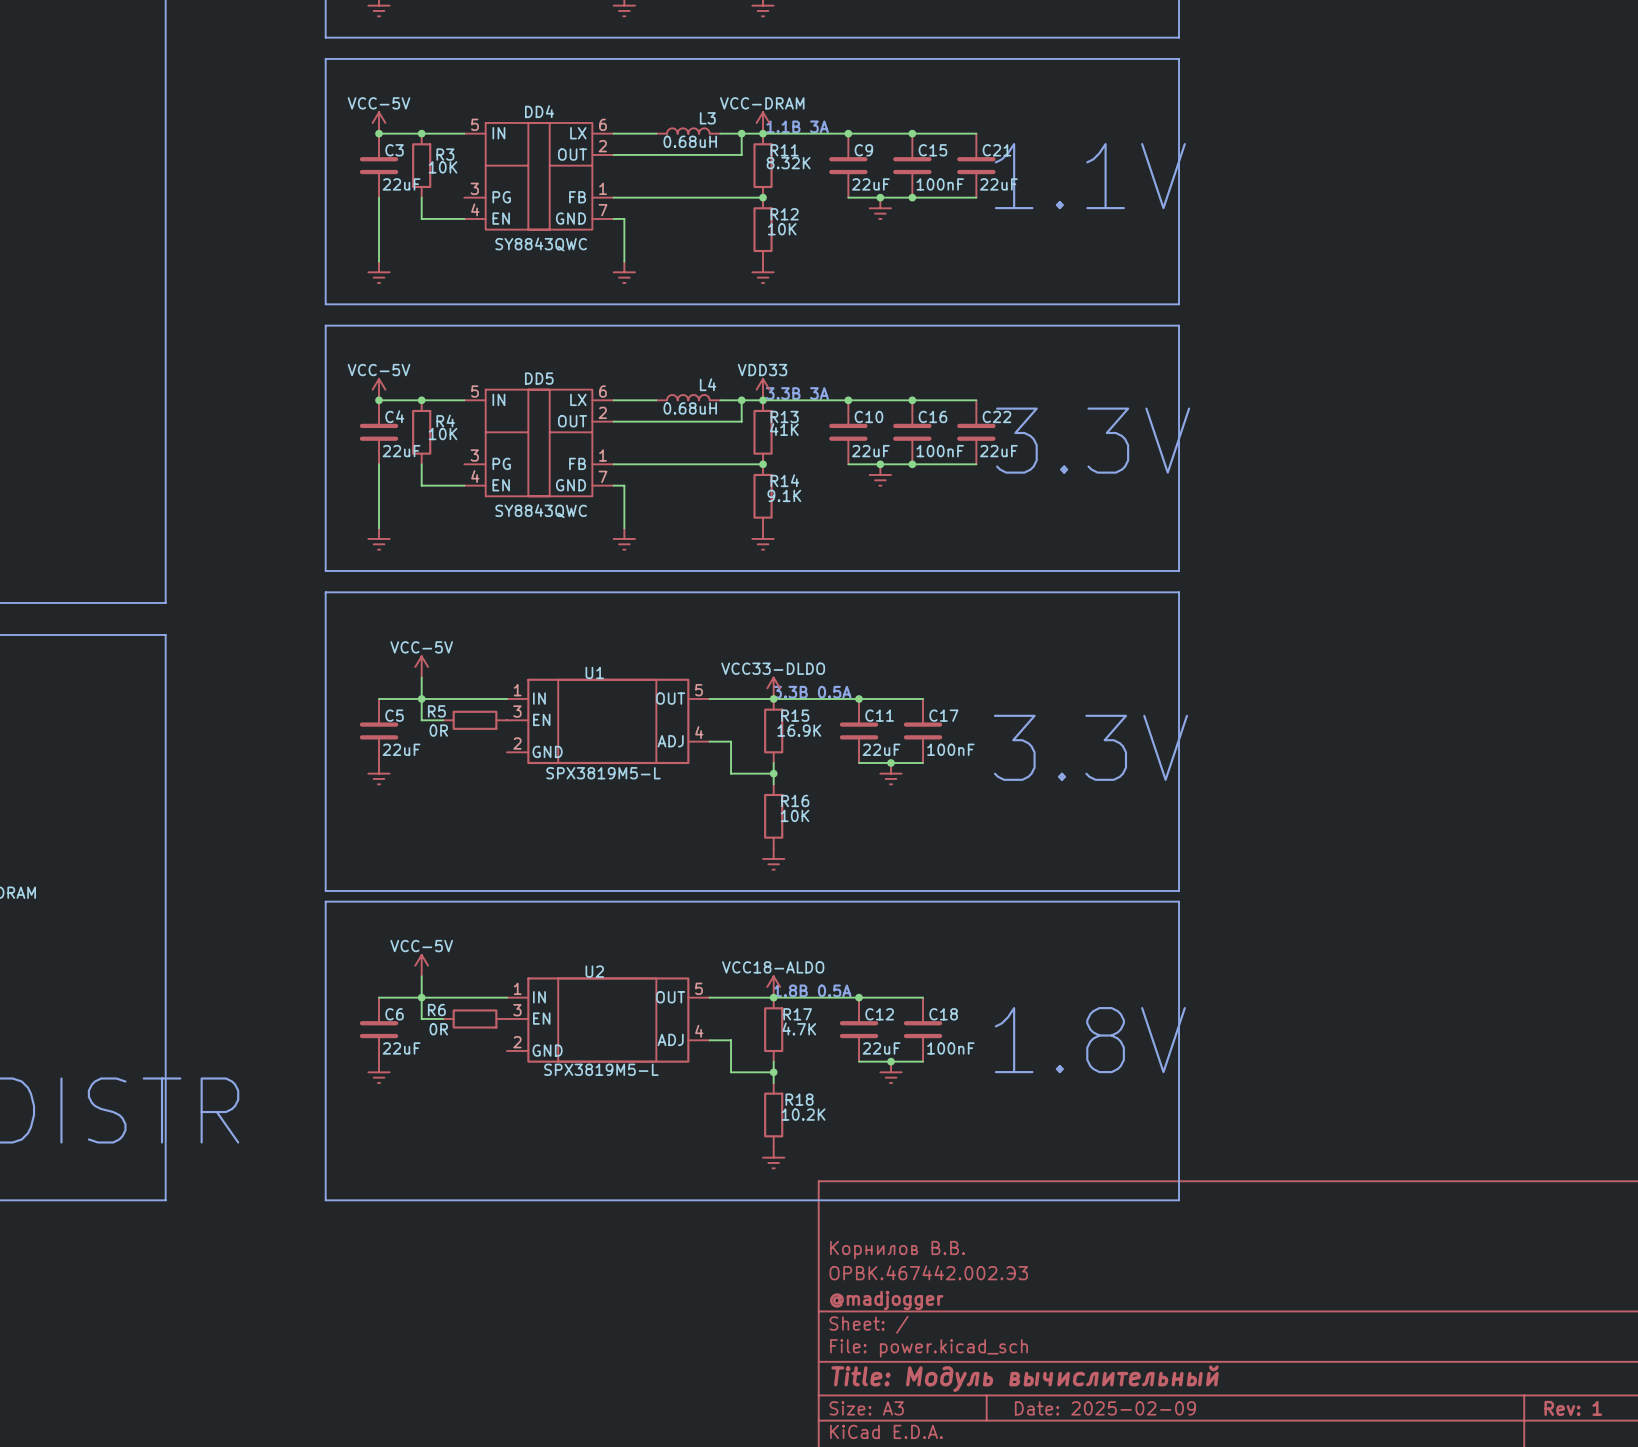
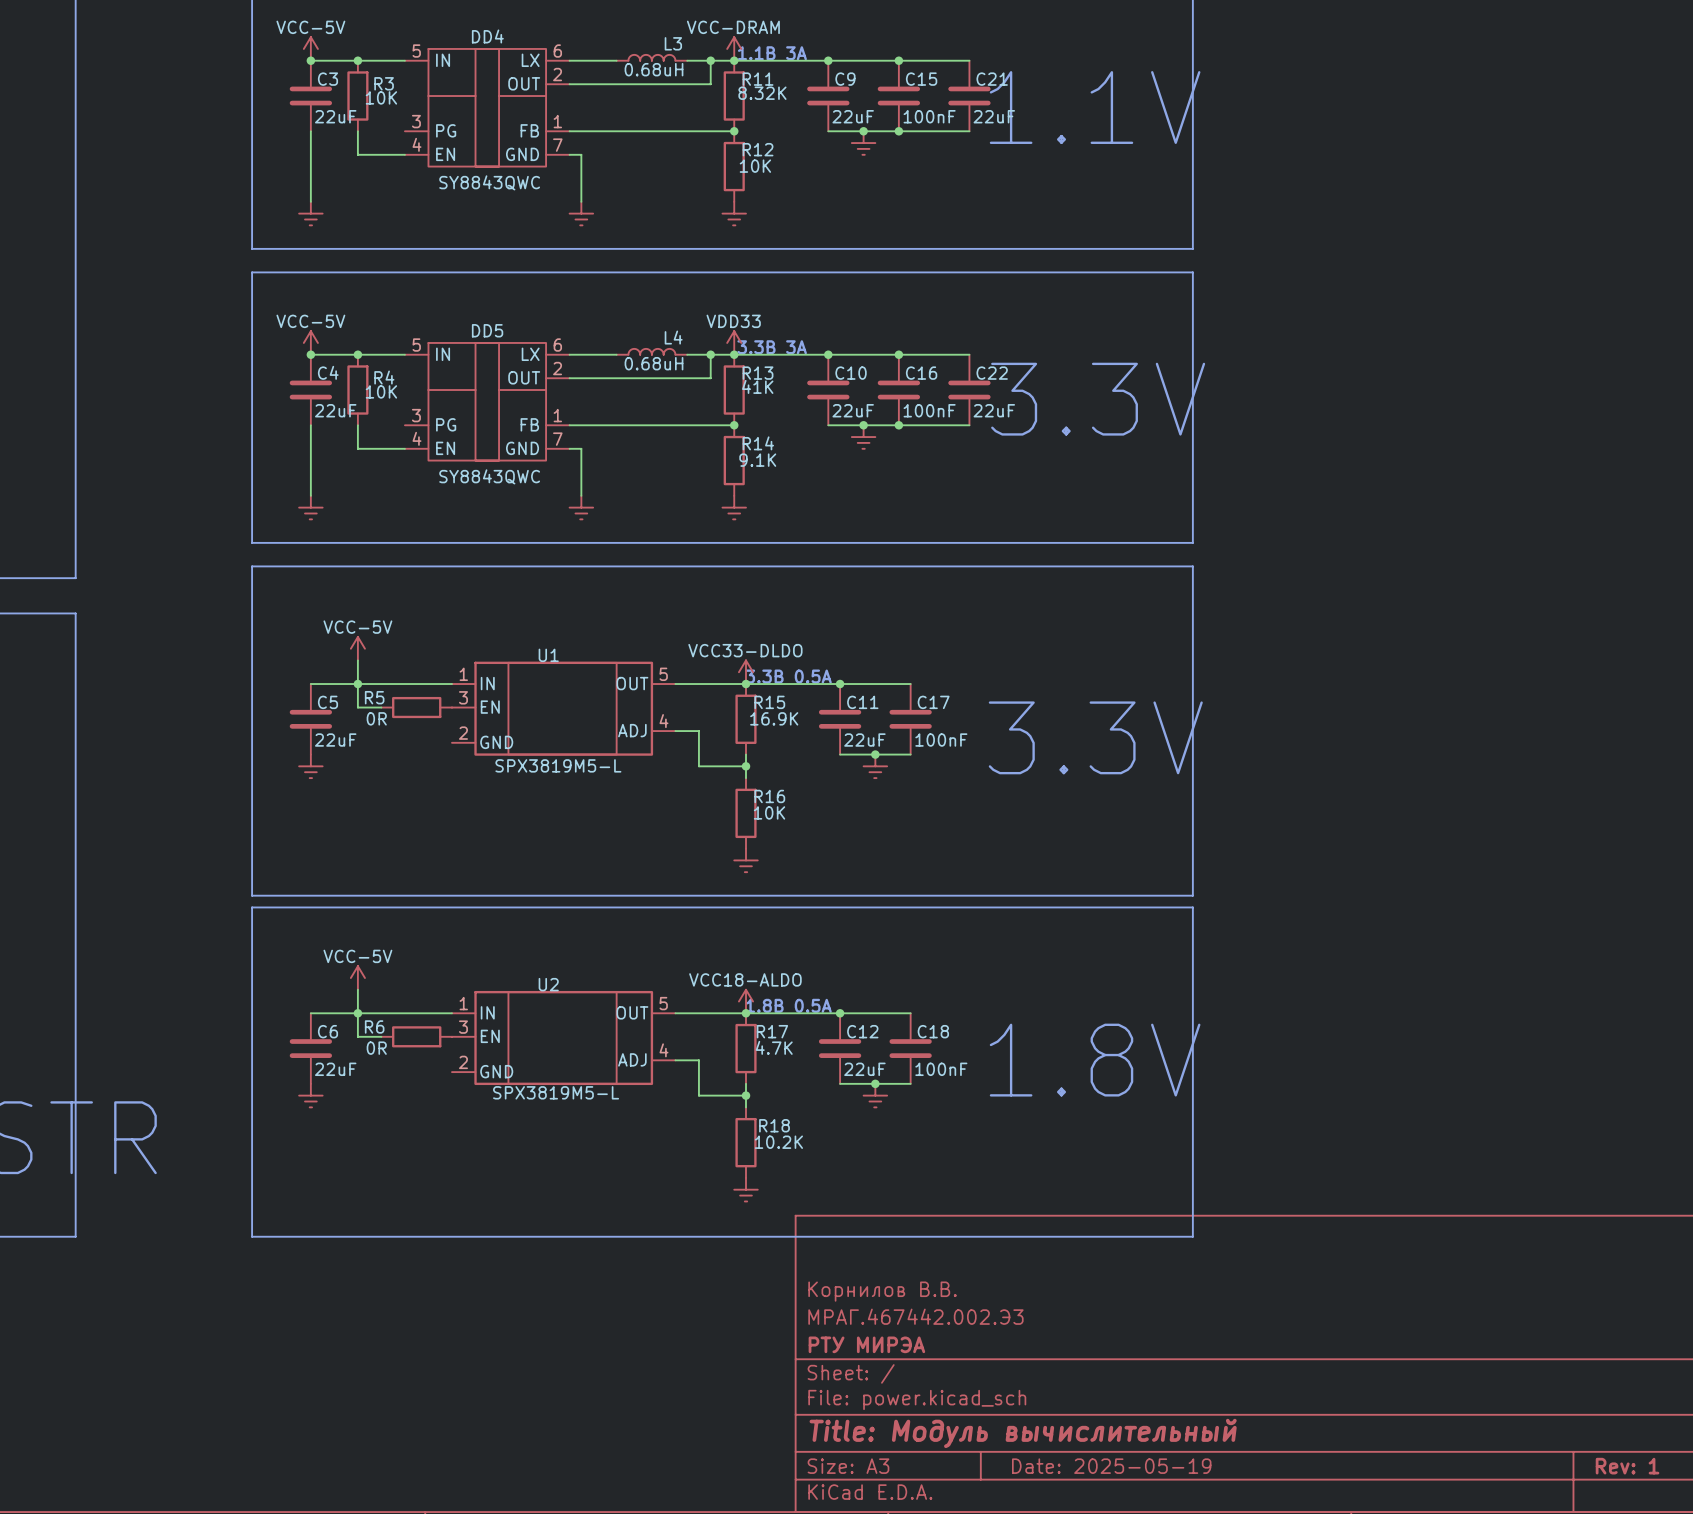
title block: ОРВК.467442.002.Э3 (928, 1272) -> МРАГ.467442.002.Э3 (915, 1316)
title block: @madjogger (886, 1300) -> РТУ МИРЭА (866, 1344)
title block: Date: 2025-02-09 (1105, 1408) -> Date: 2025-05-19 (1111, 1466)

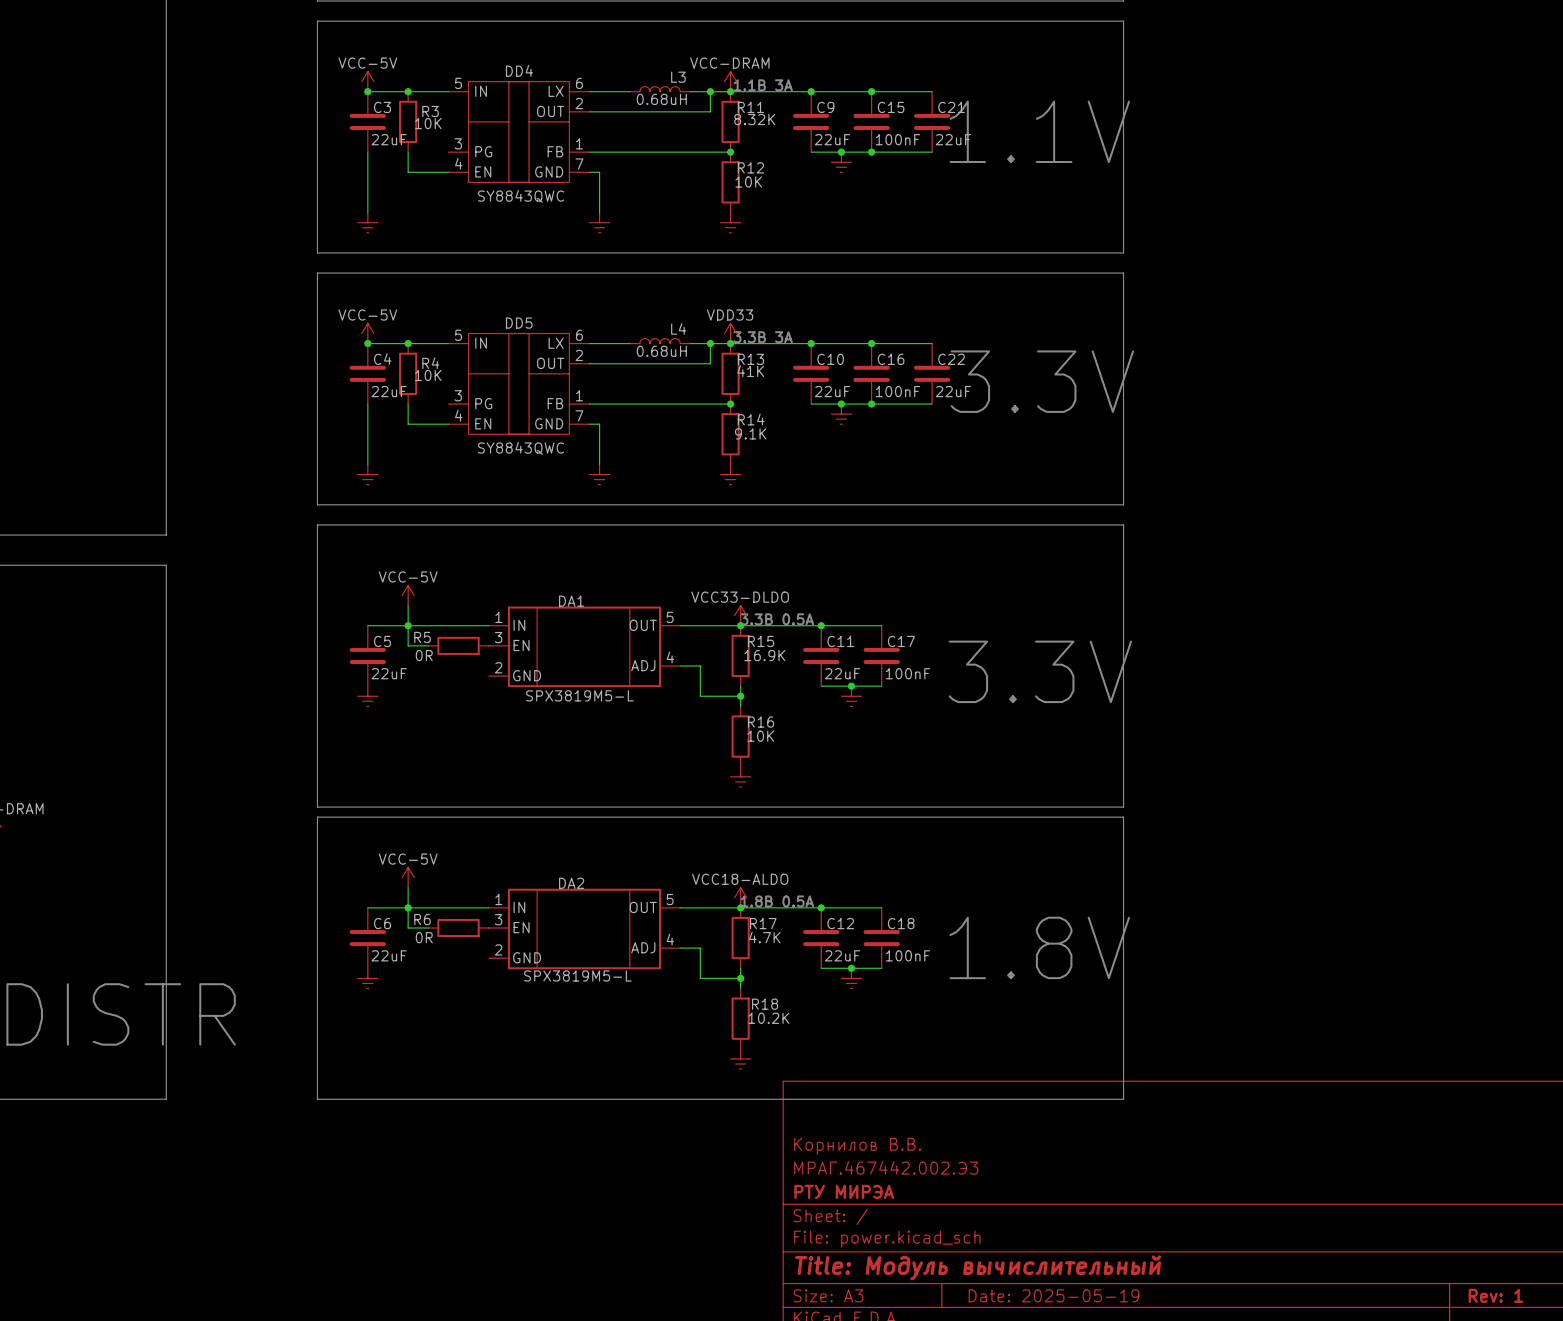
U1 name: U1 (548, 655) -> DA1 (571, 601)
U2 name: U2 (548, 984) -> DA2 (571, 883)

